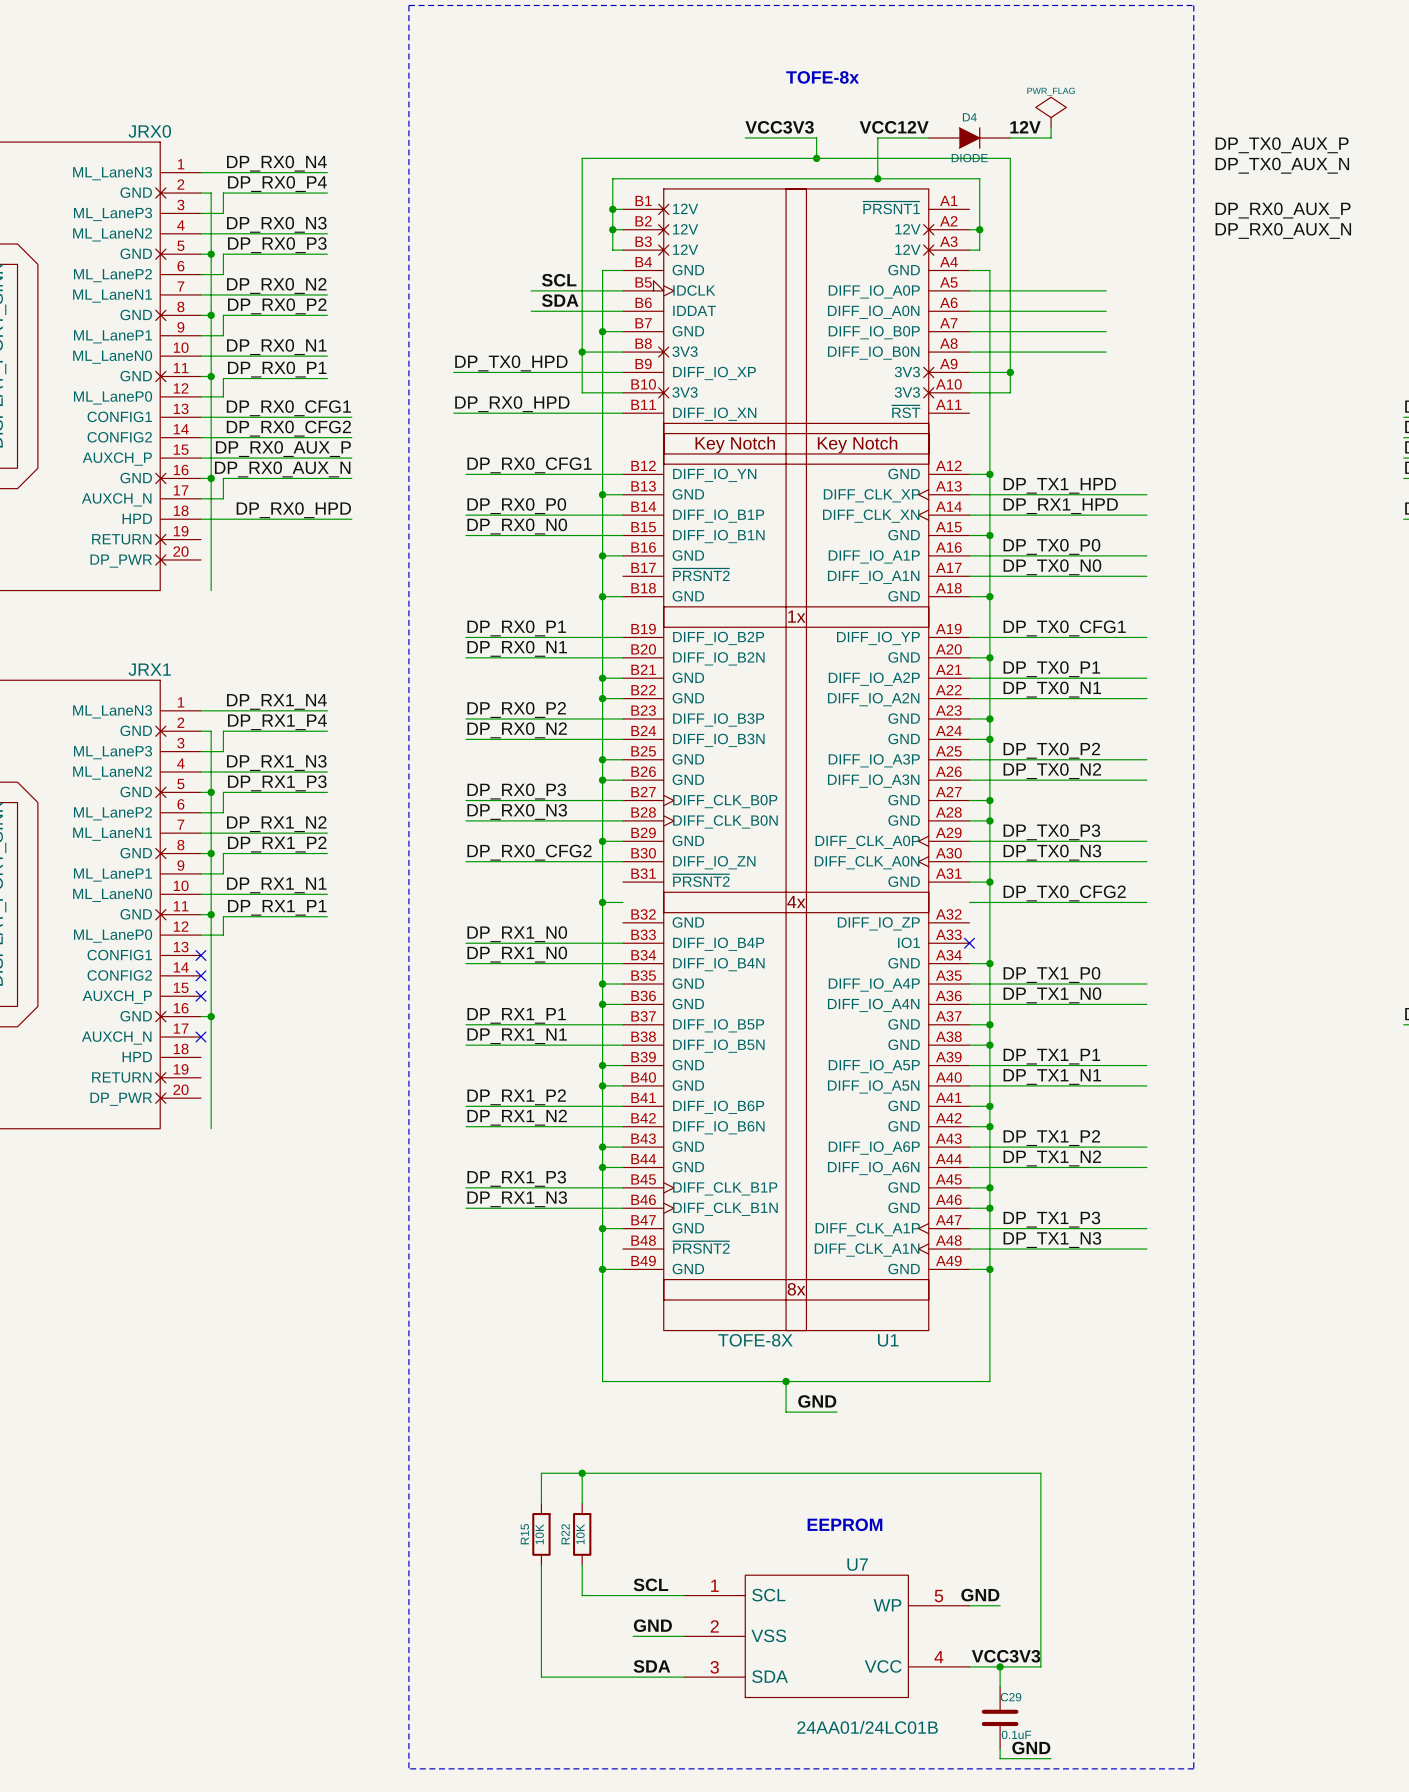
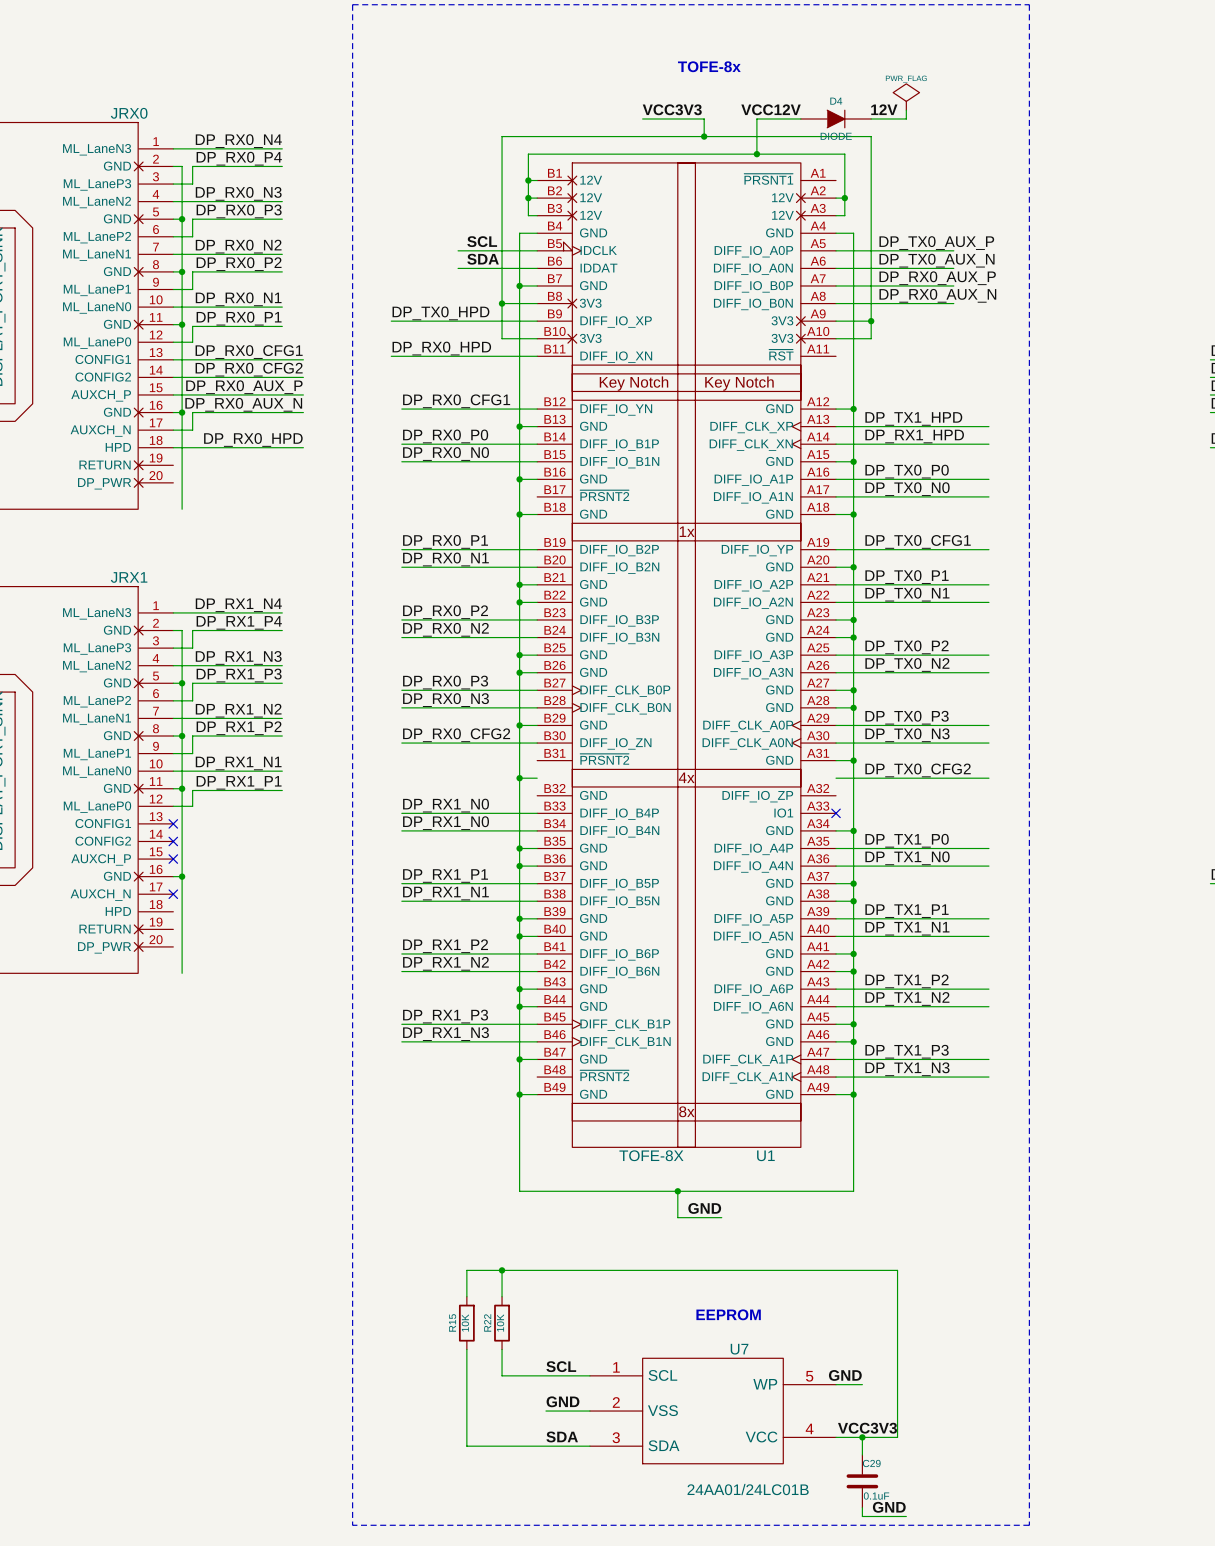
label: DP_TX0_AUX_P (1282, 145) -> none
label: DP_TX0_AUX_N (1282, 165) -> none
label: DP_RX0_AUX_P (1283, 210) -> none
label: DP_RX0_AUX_N (1283, 230) -> none
label: none -> DP_TX0_AUX_P (936, 243)
label: none -> DP_TX0_AUX_N (937, 260)
label: none -> DP_RX0_AUX_P (937, 278)
label: none -> DP_RX0_AUX_N (937, 295)

